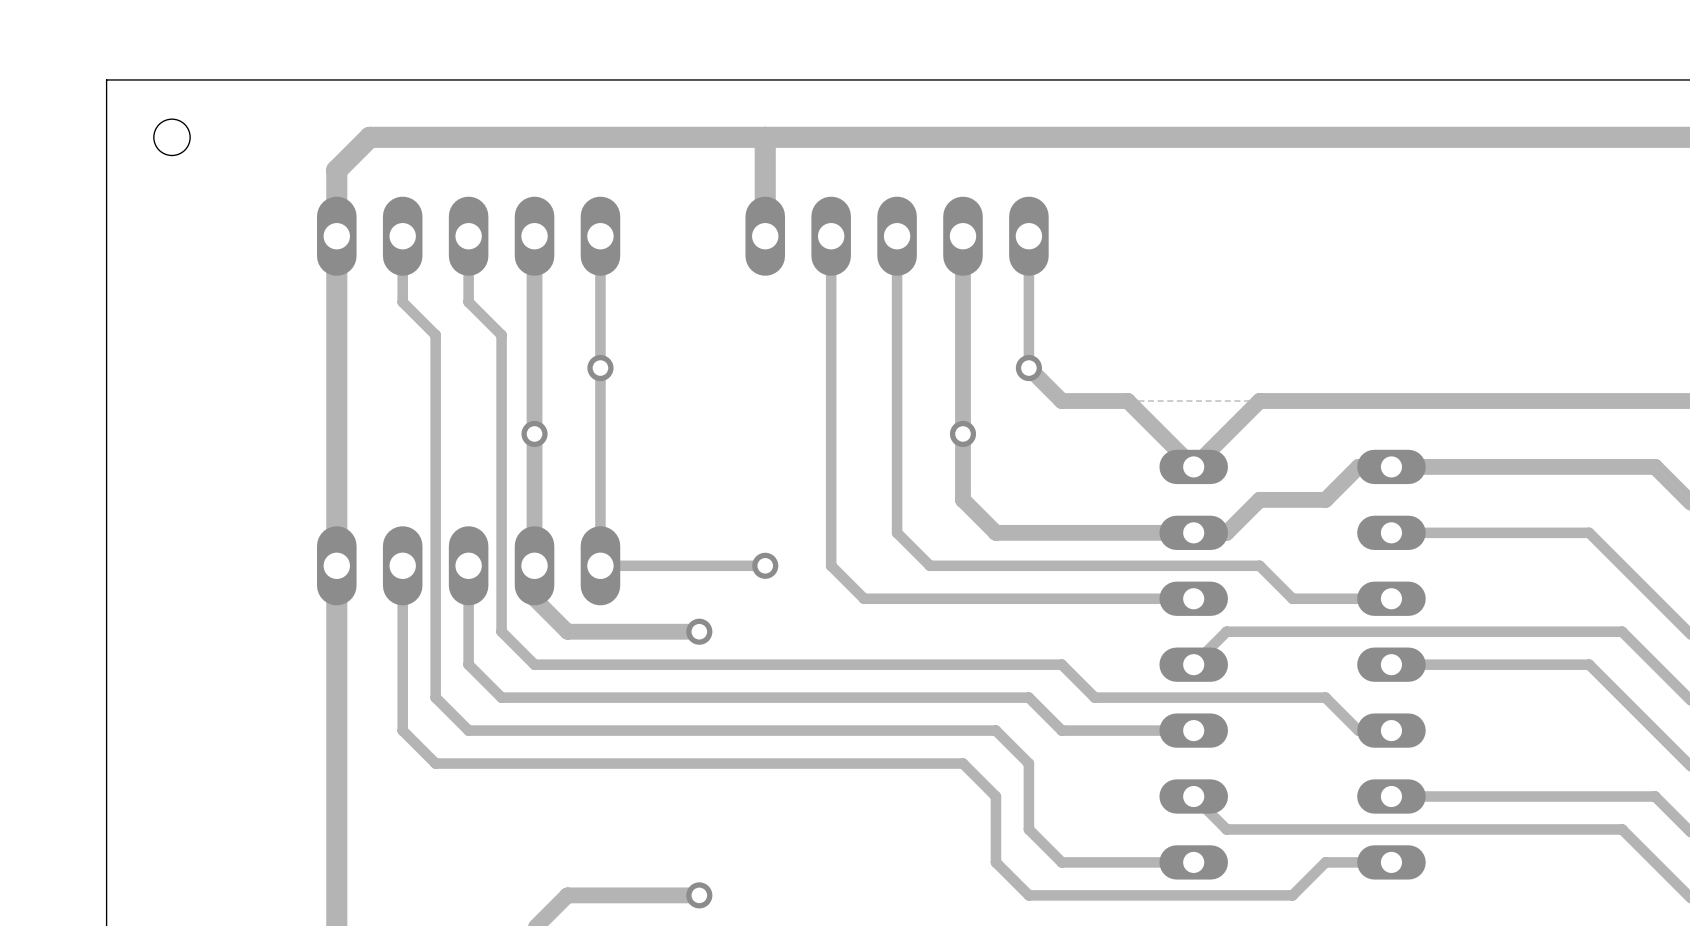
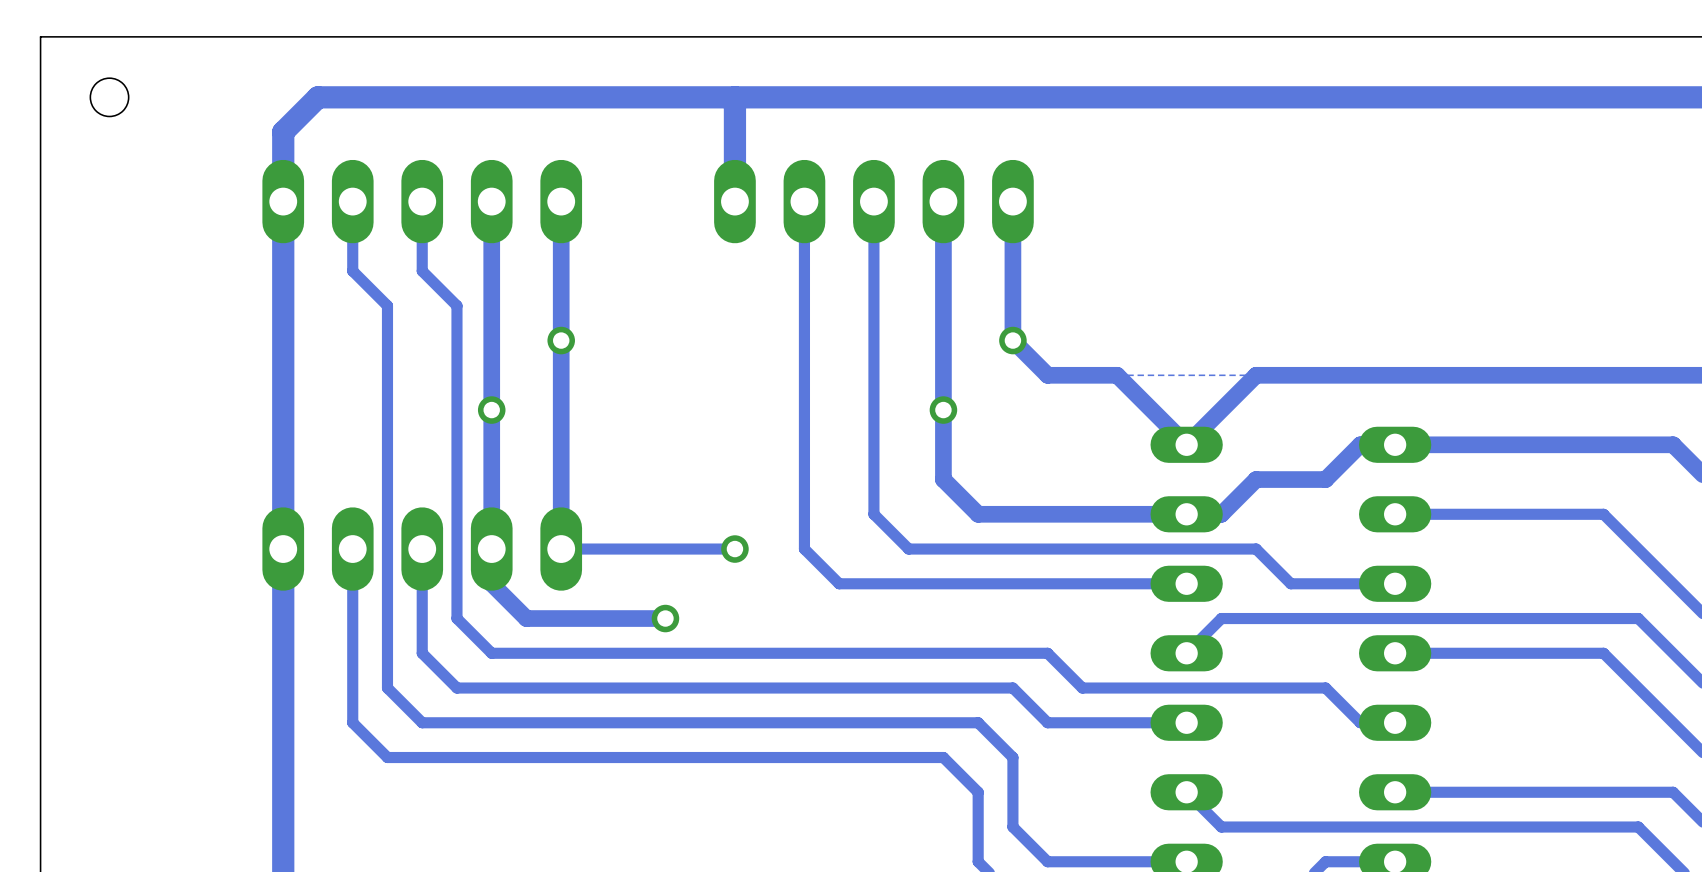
track width: thin (600, 236) (600, 565) -> thick (561, 201) (561, 549)
track width: thin (1028, 236) (1028, 368) -> thick (1012, 201) (1012, 340)

